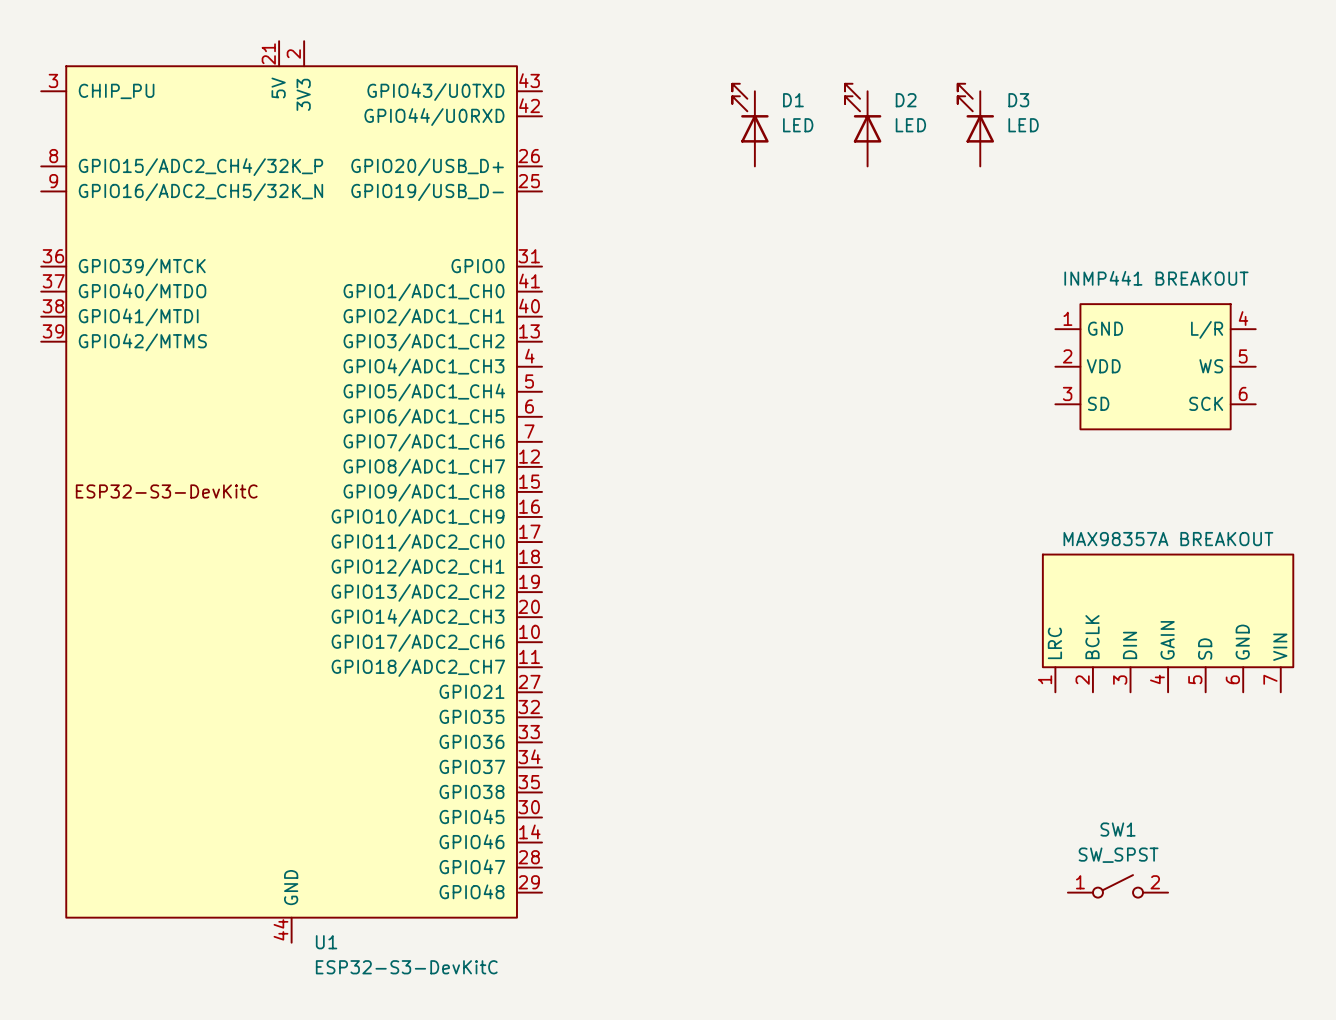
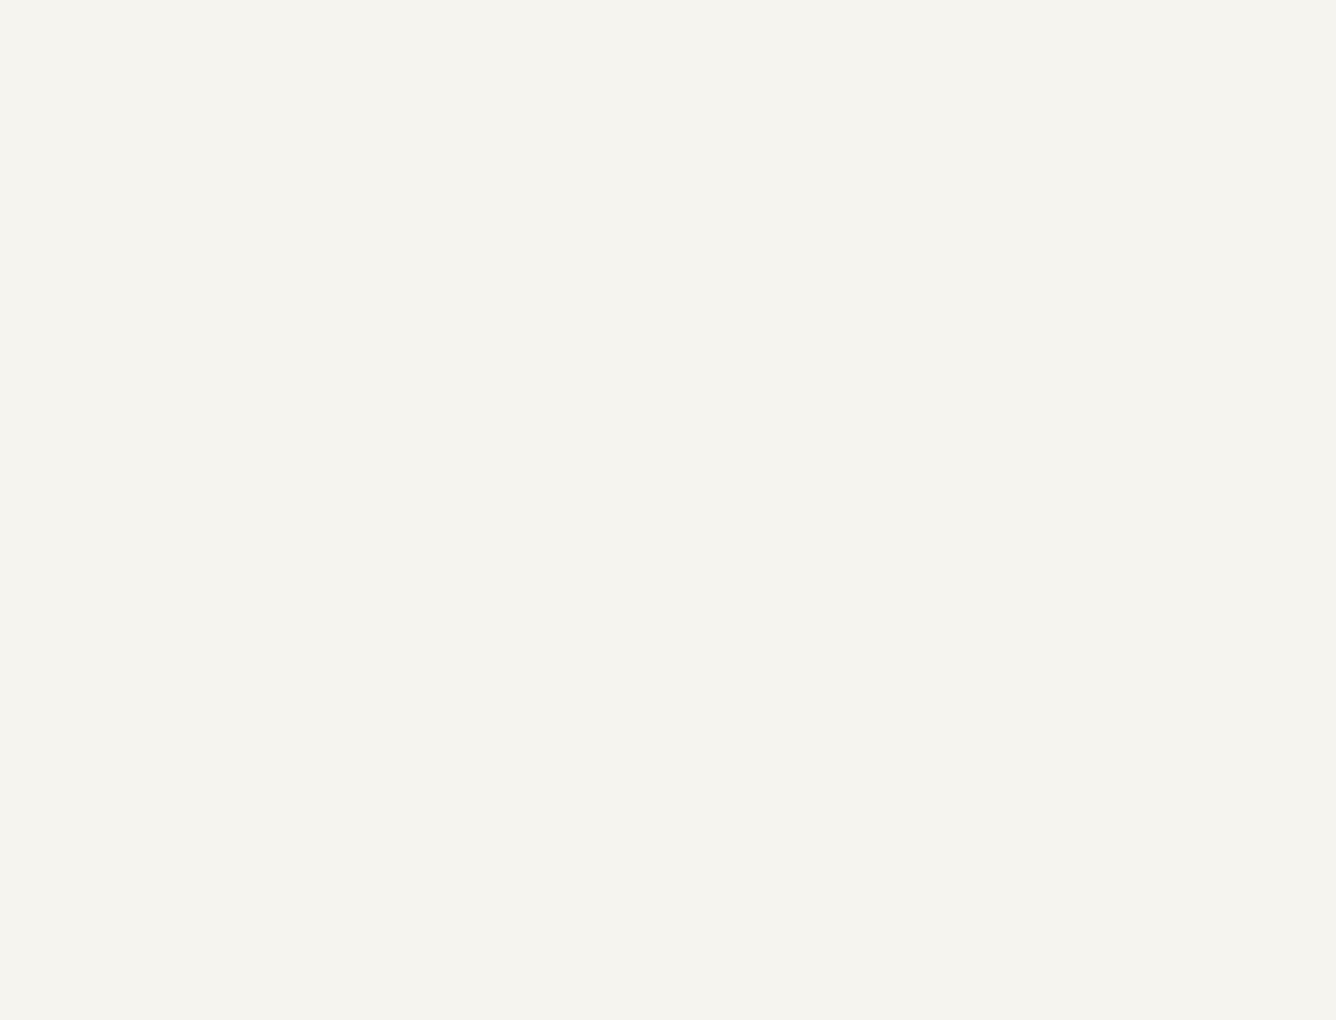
D1: LED (750, 125) -> none
D2: LED (863, 125) -> none
D3: LED (975, 125) -> none
part: INMP441 BREAKOUT (1155, 366) -> none
U1: ESP32-S3-DevKitC (291, 491) -> none
part: MAX98357A BREAKOUT (1168, 623) -> none
SW1: SW_SPST (1117, 886) -> none

